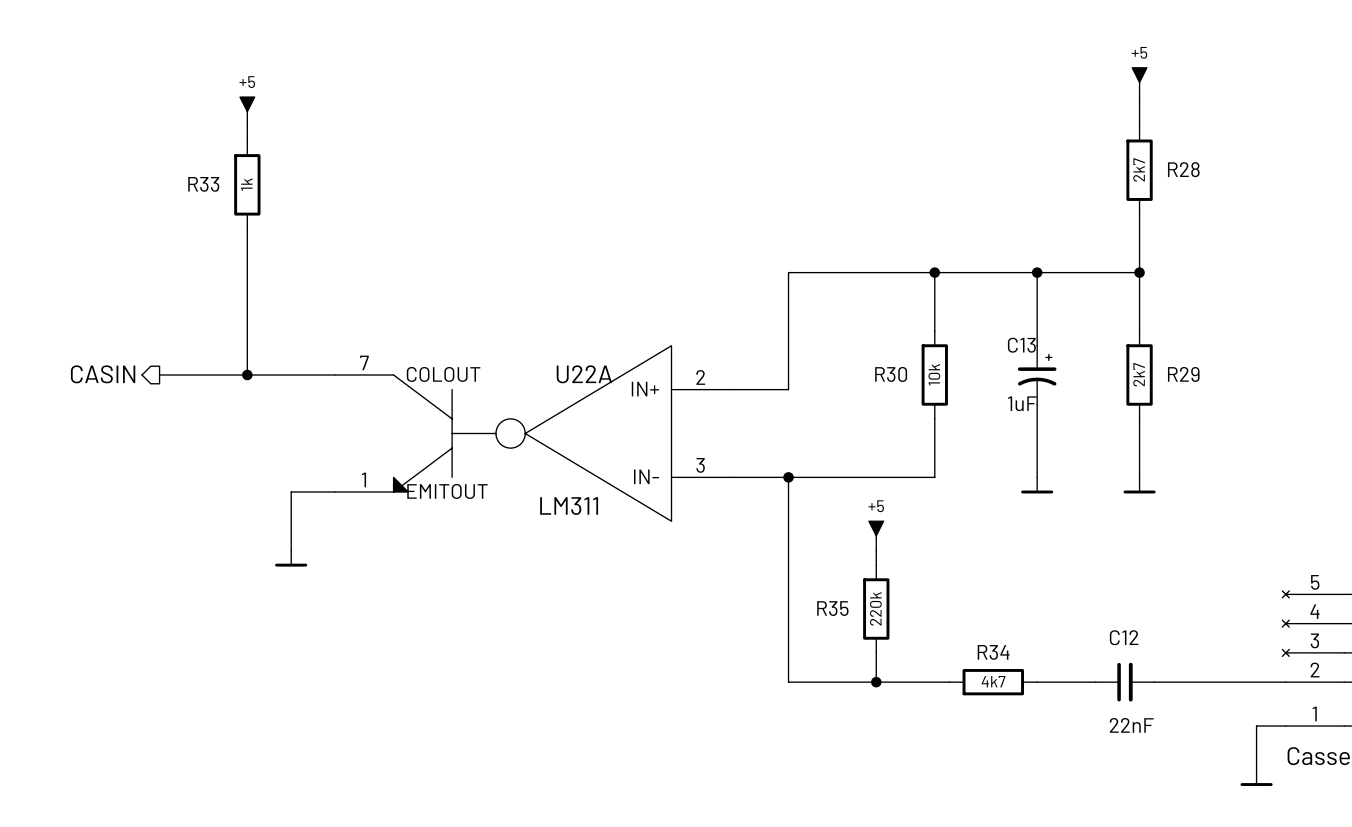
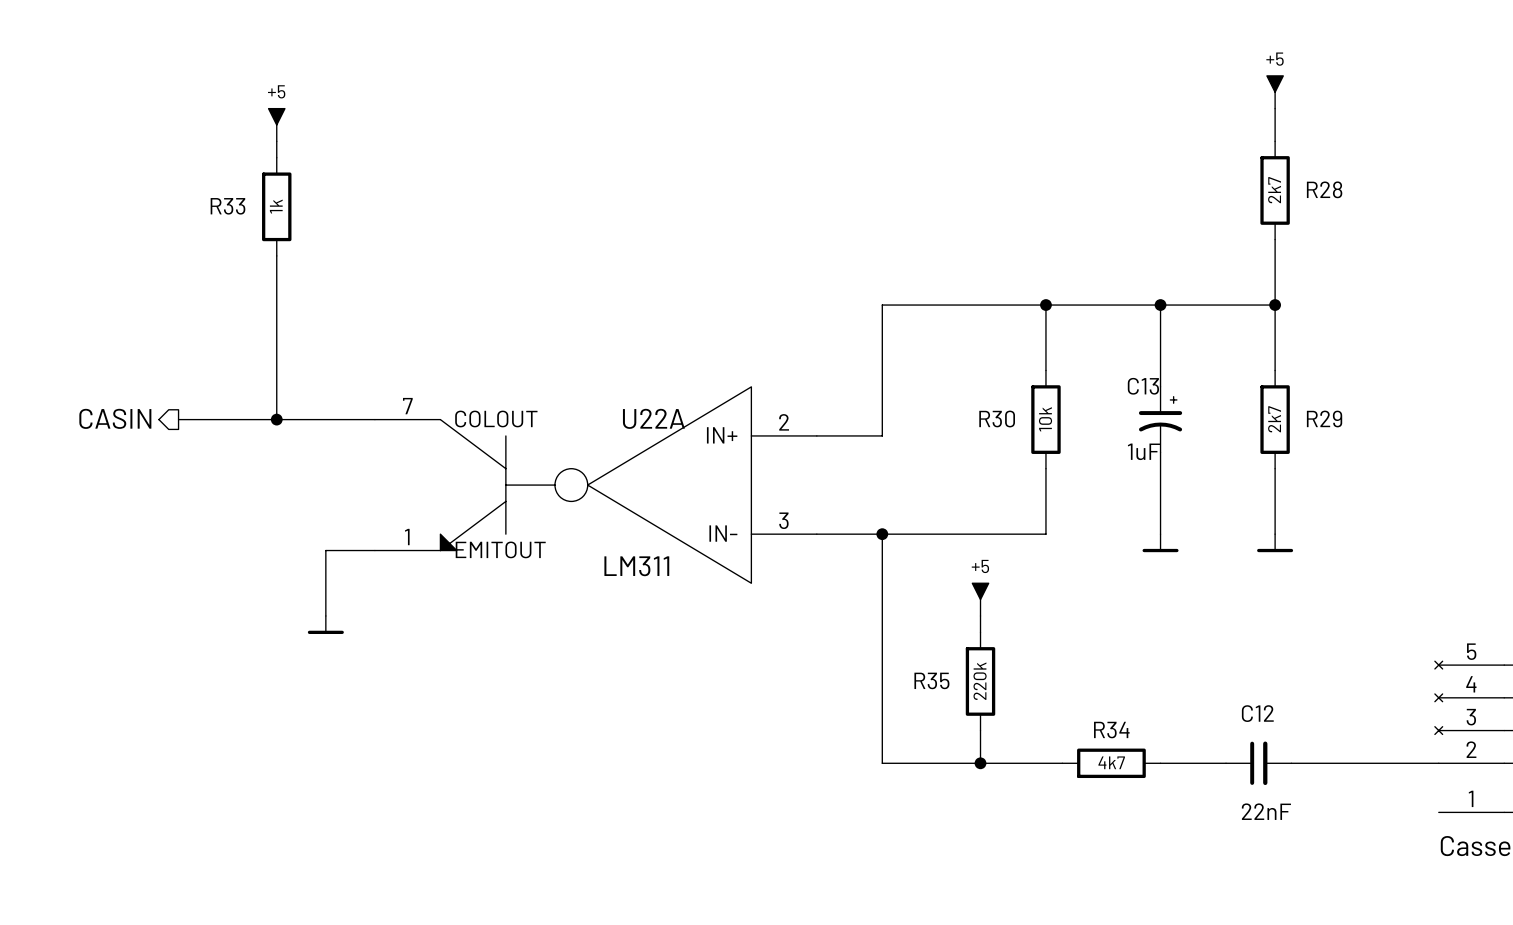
wire: (1285, 726) (1256, 726) (1256, 769) -> none
power symbol: (1256, 777) -> none

